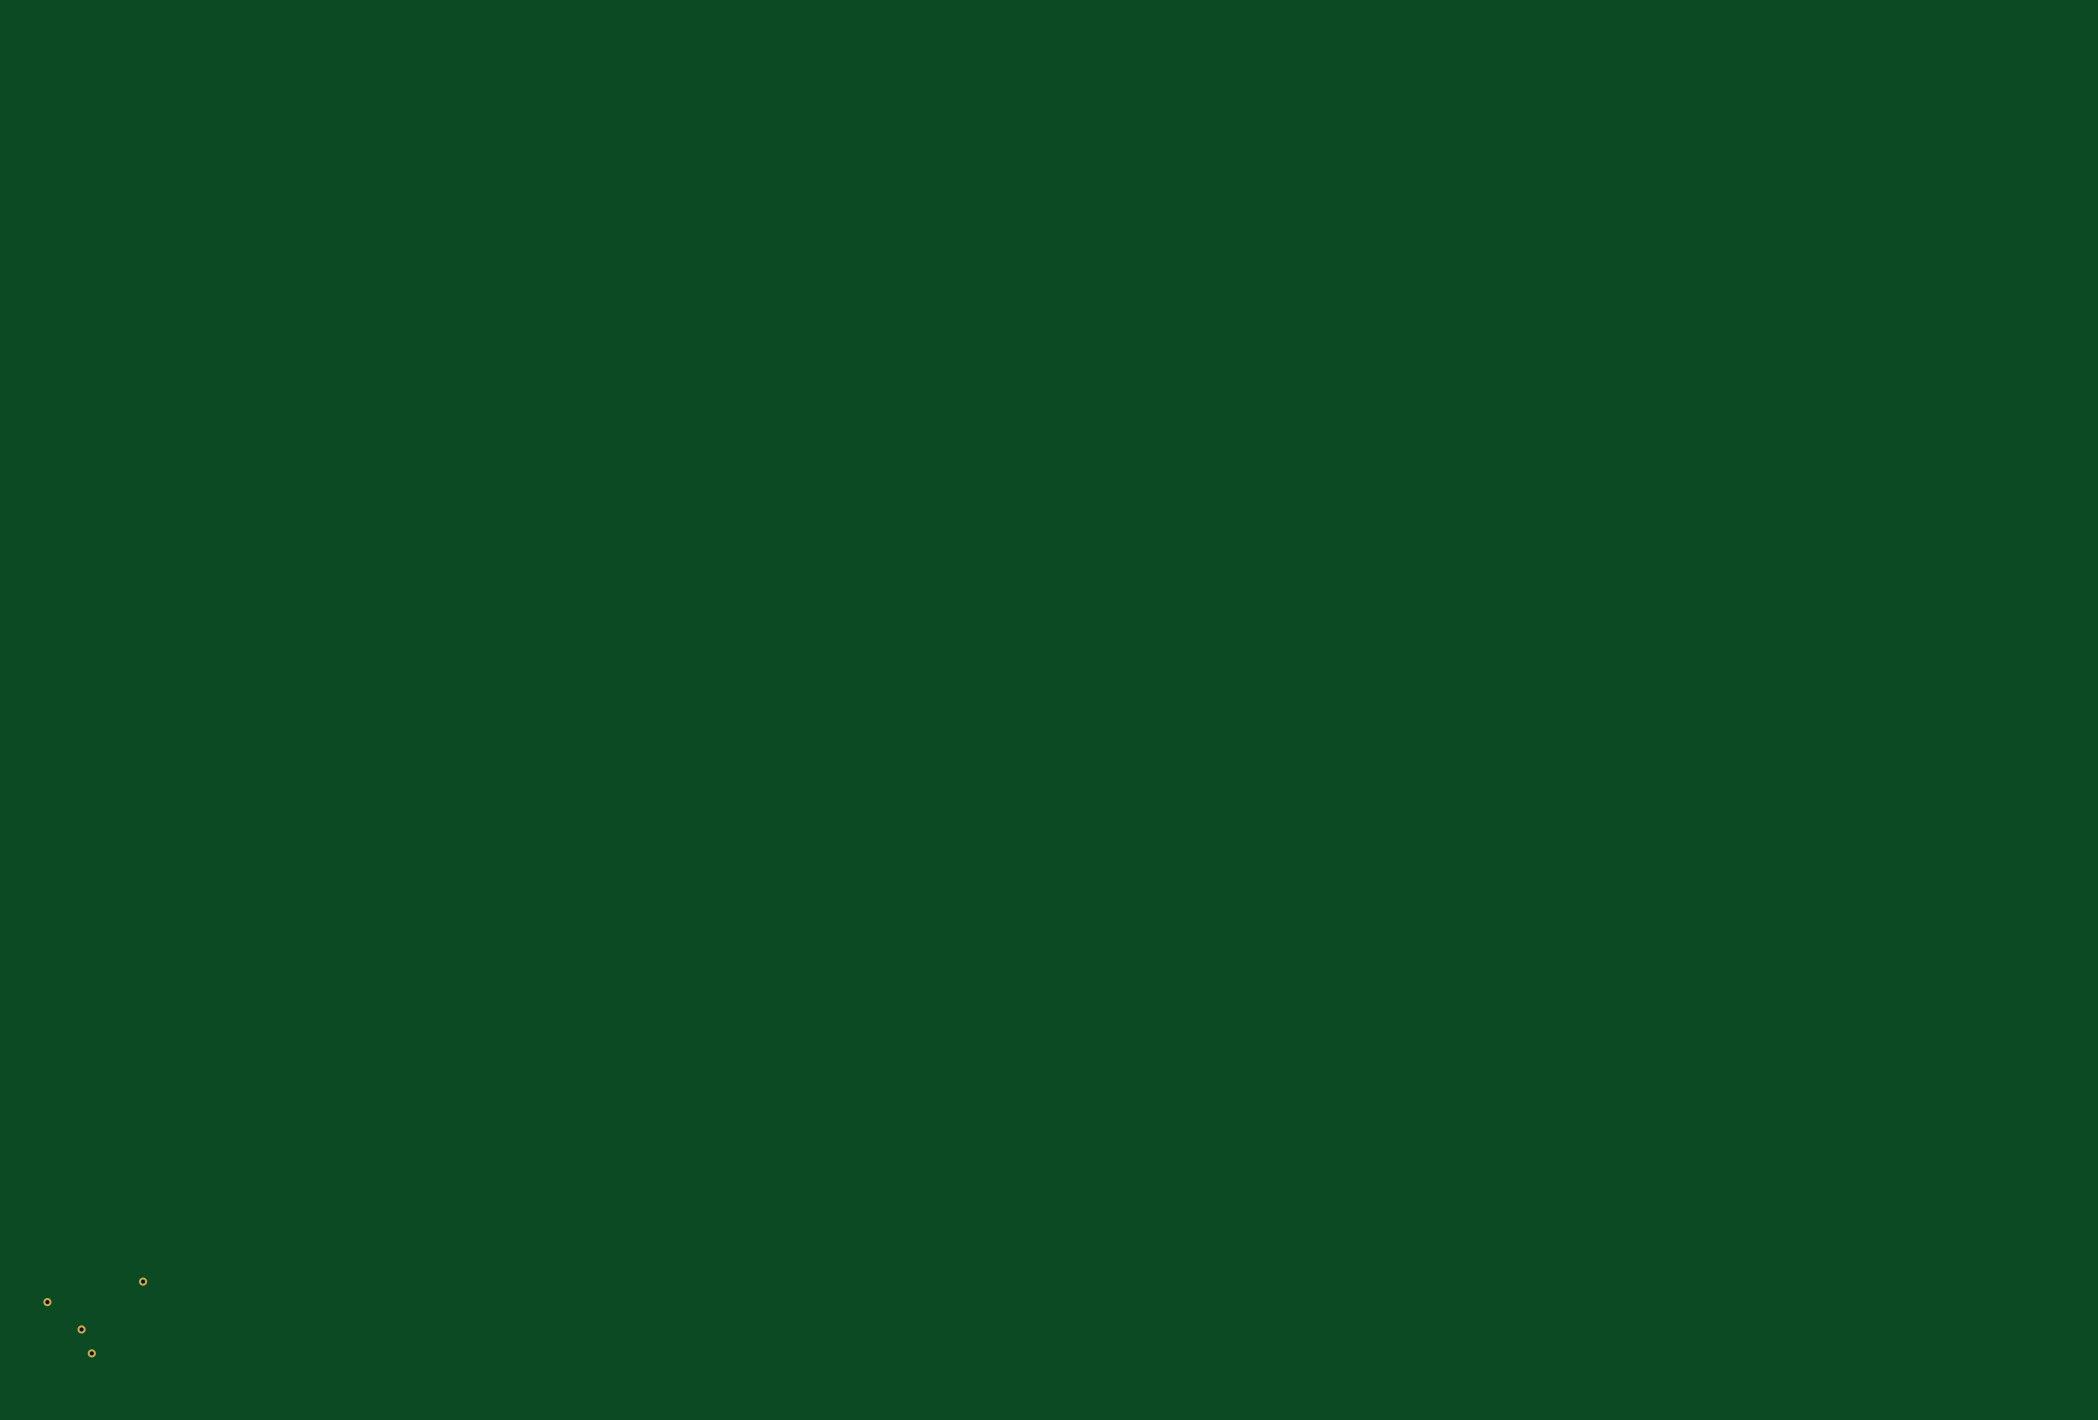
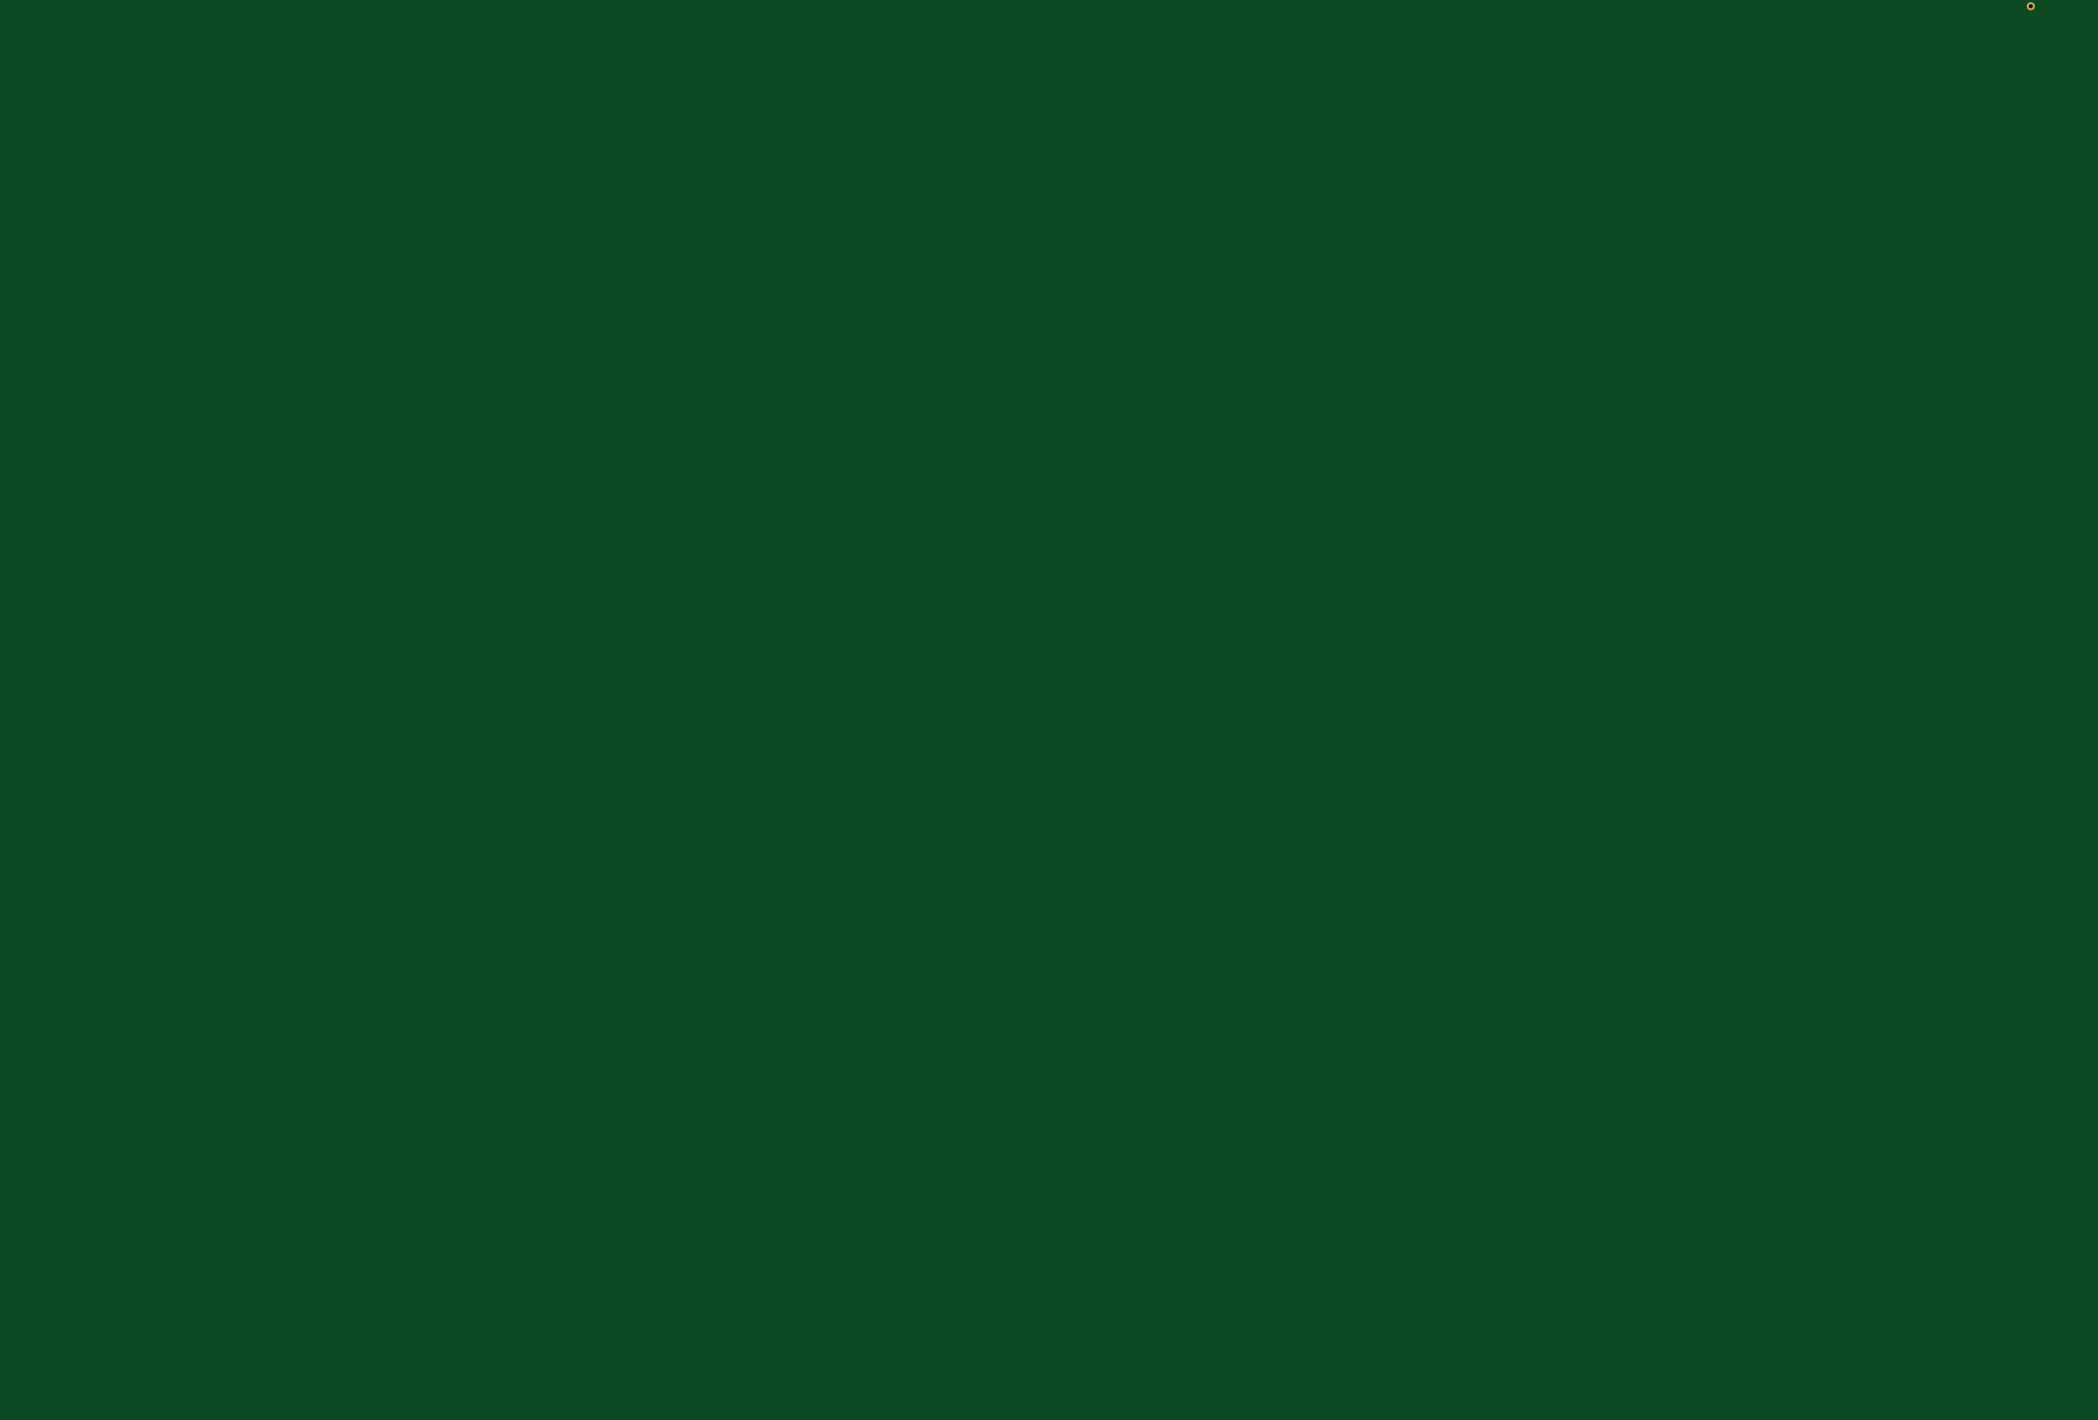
via: none -> (2030, 6)
via: (143, 1281) -> none
via: (47, 1302) -> none
via: (81, 1329) -> none
via: (91, 1353) -> none

